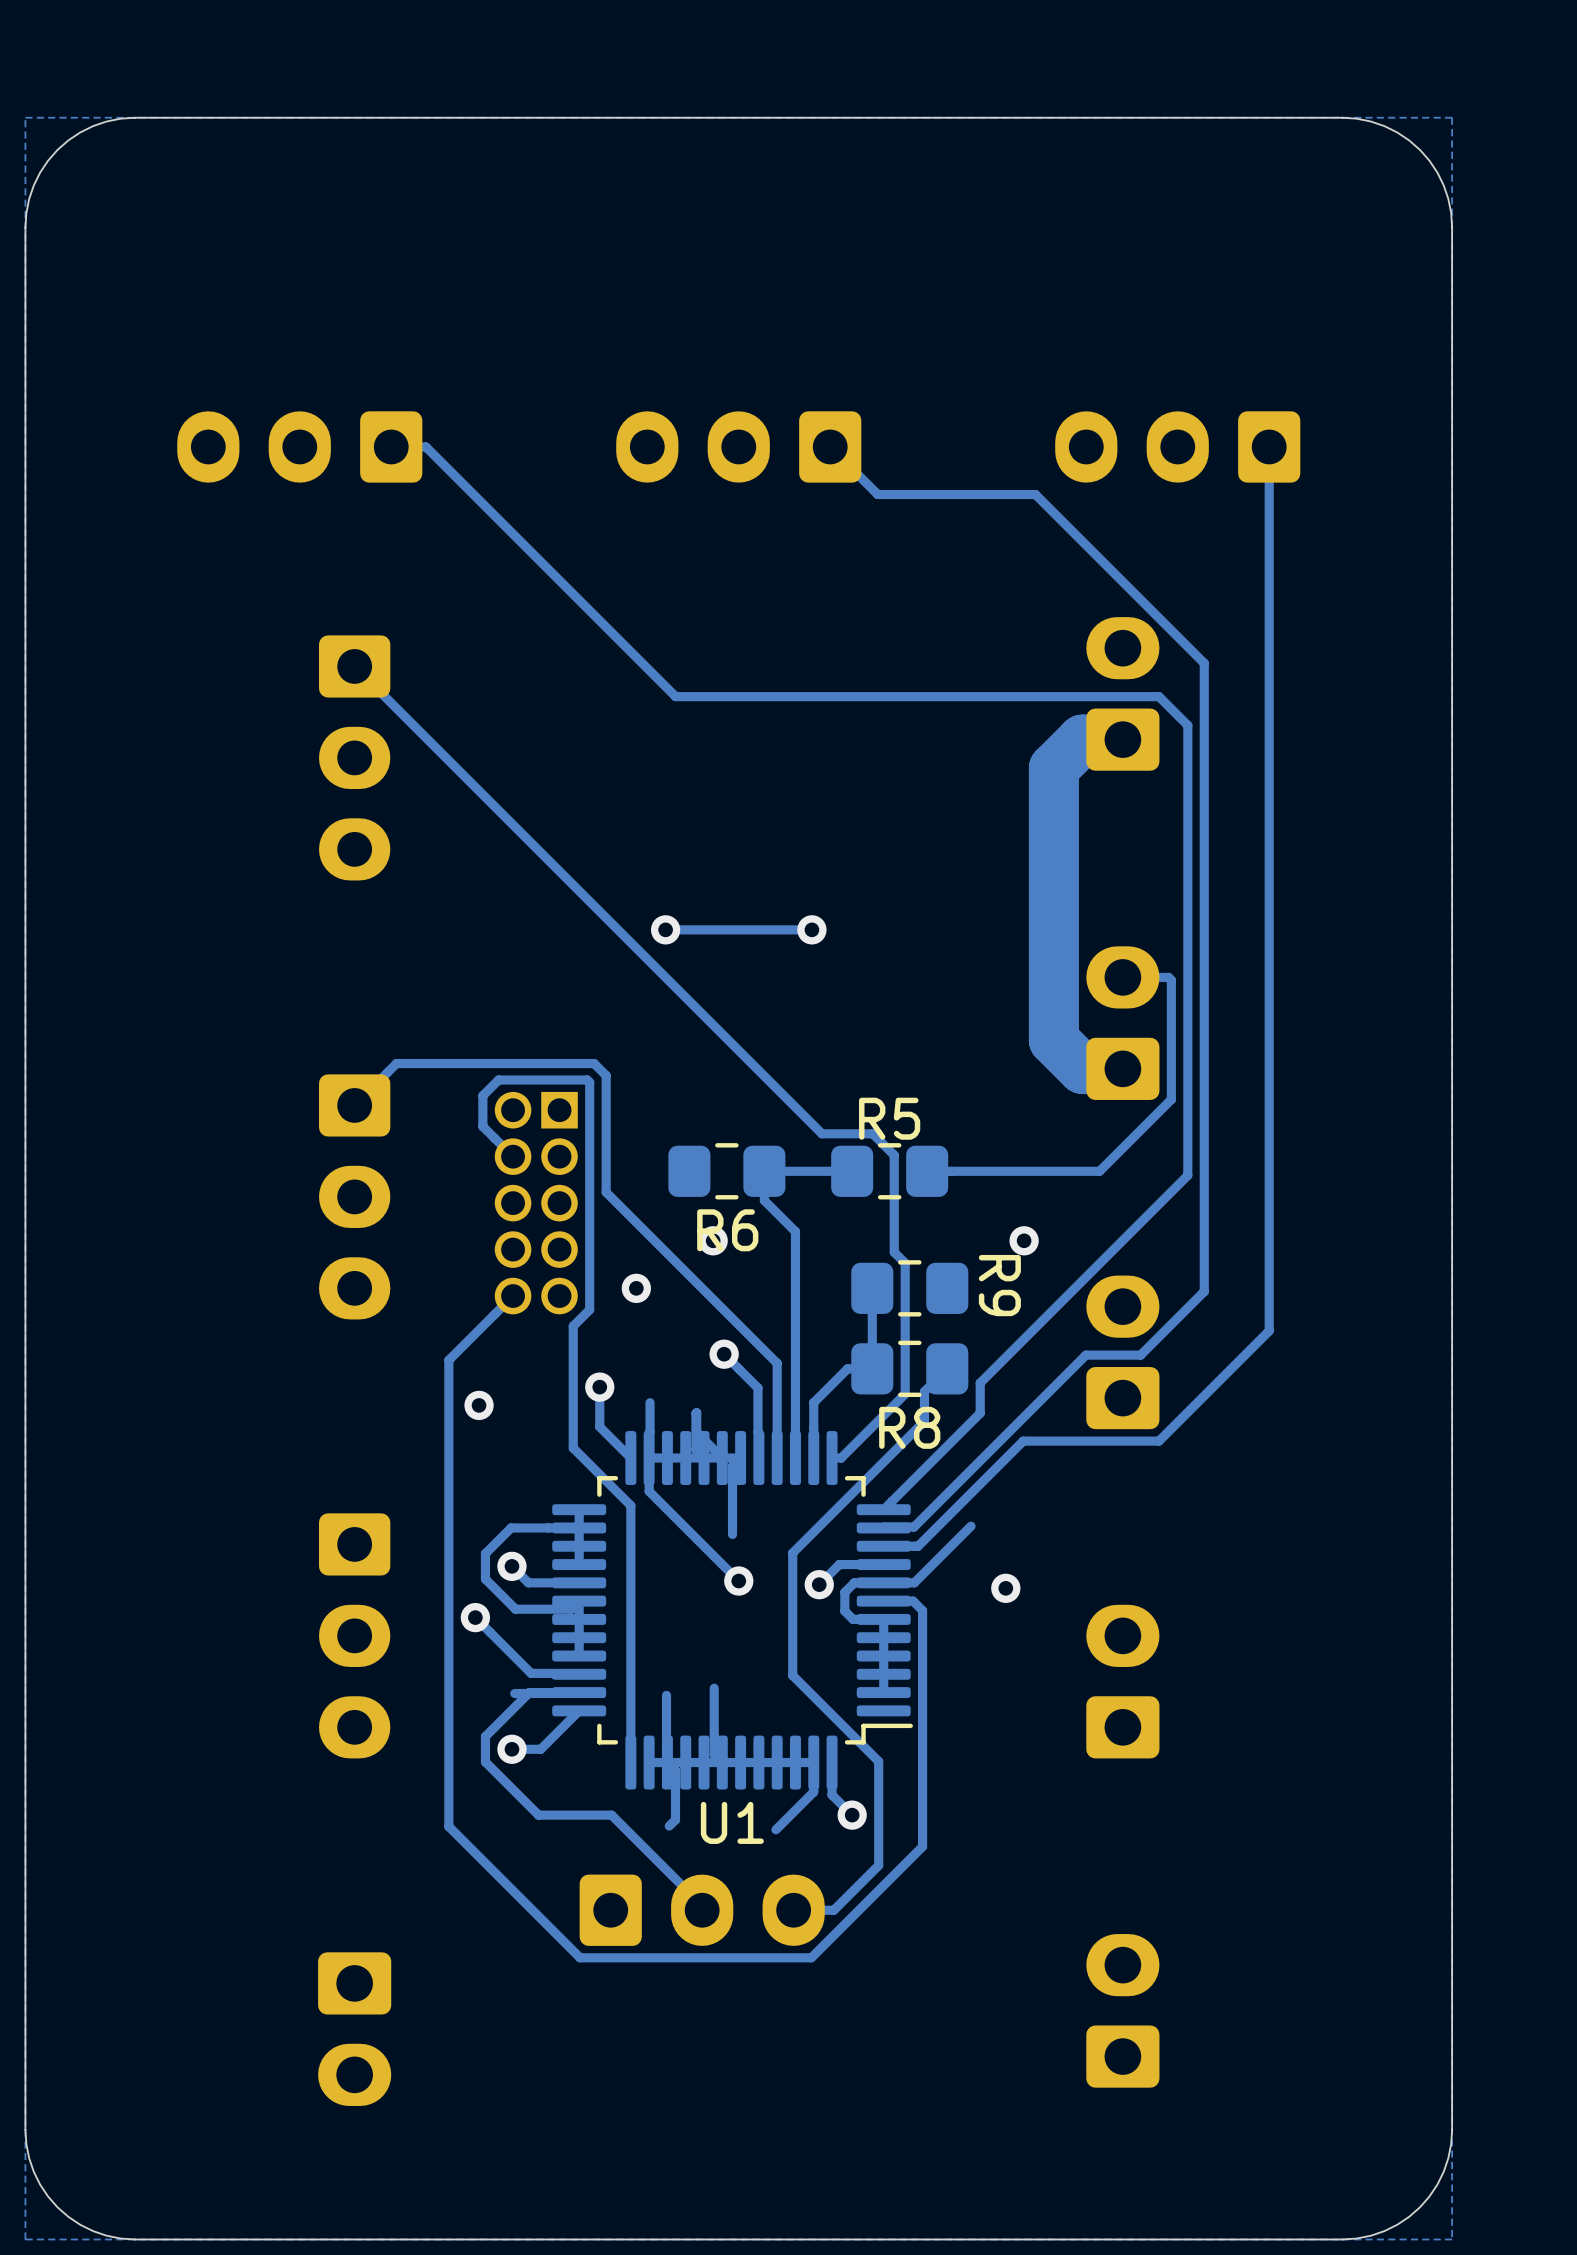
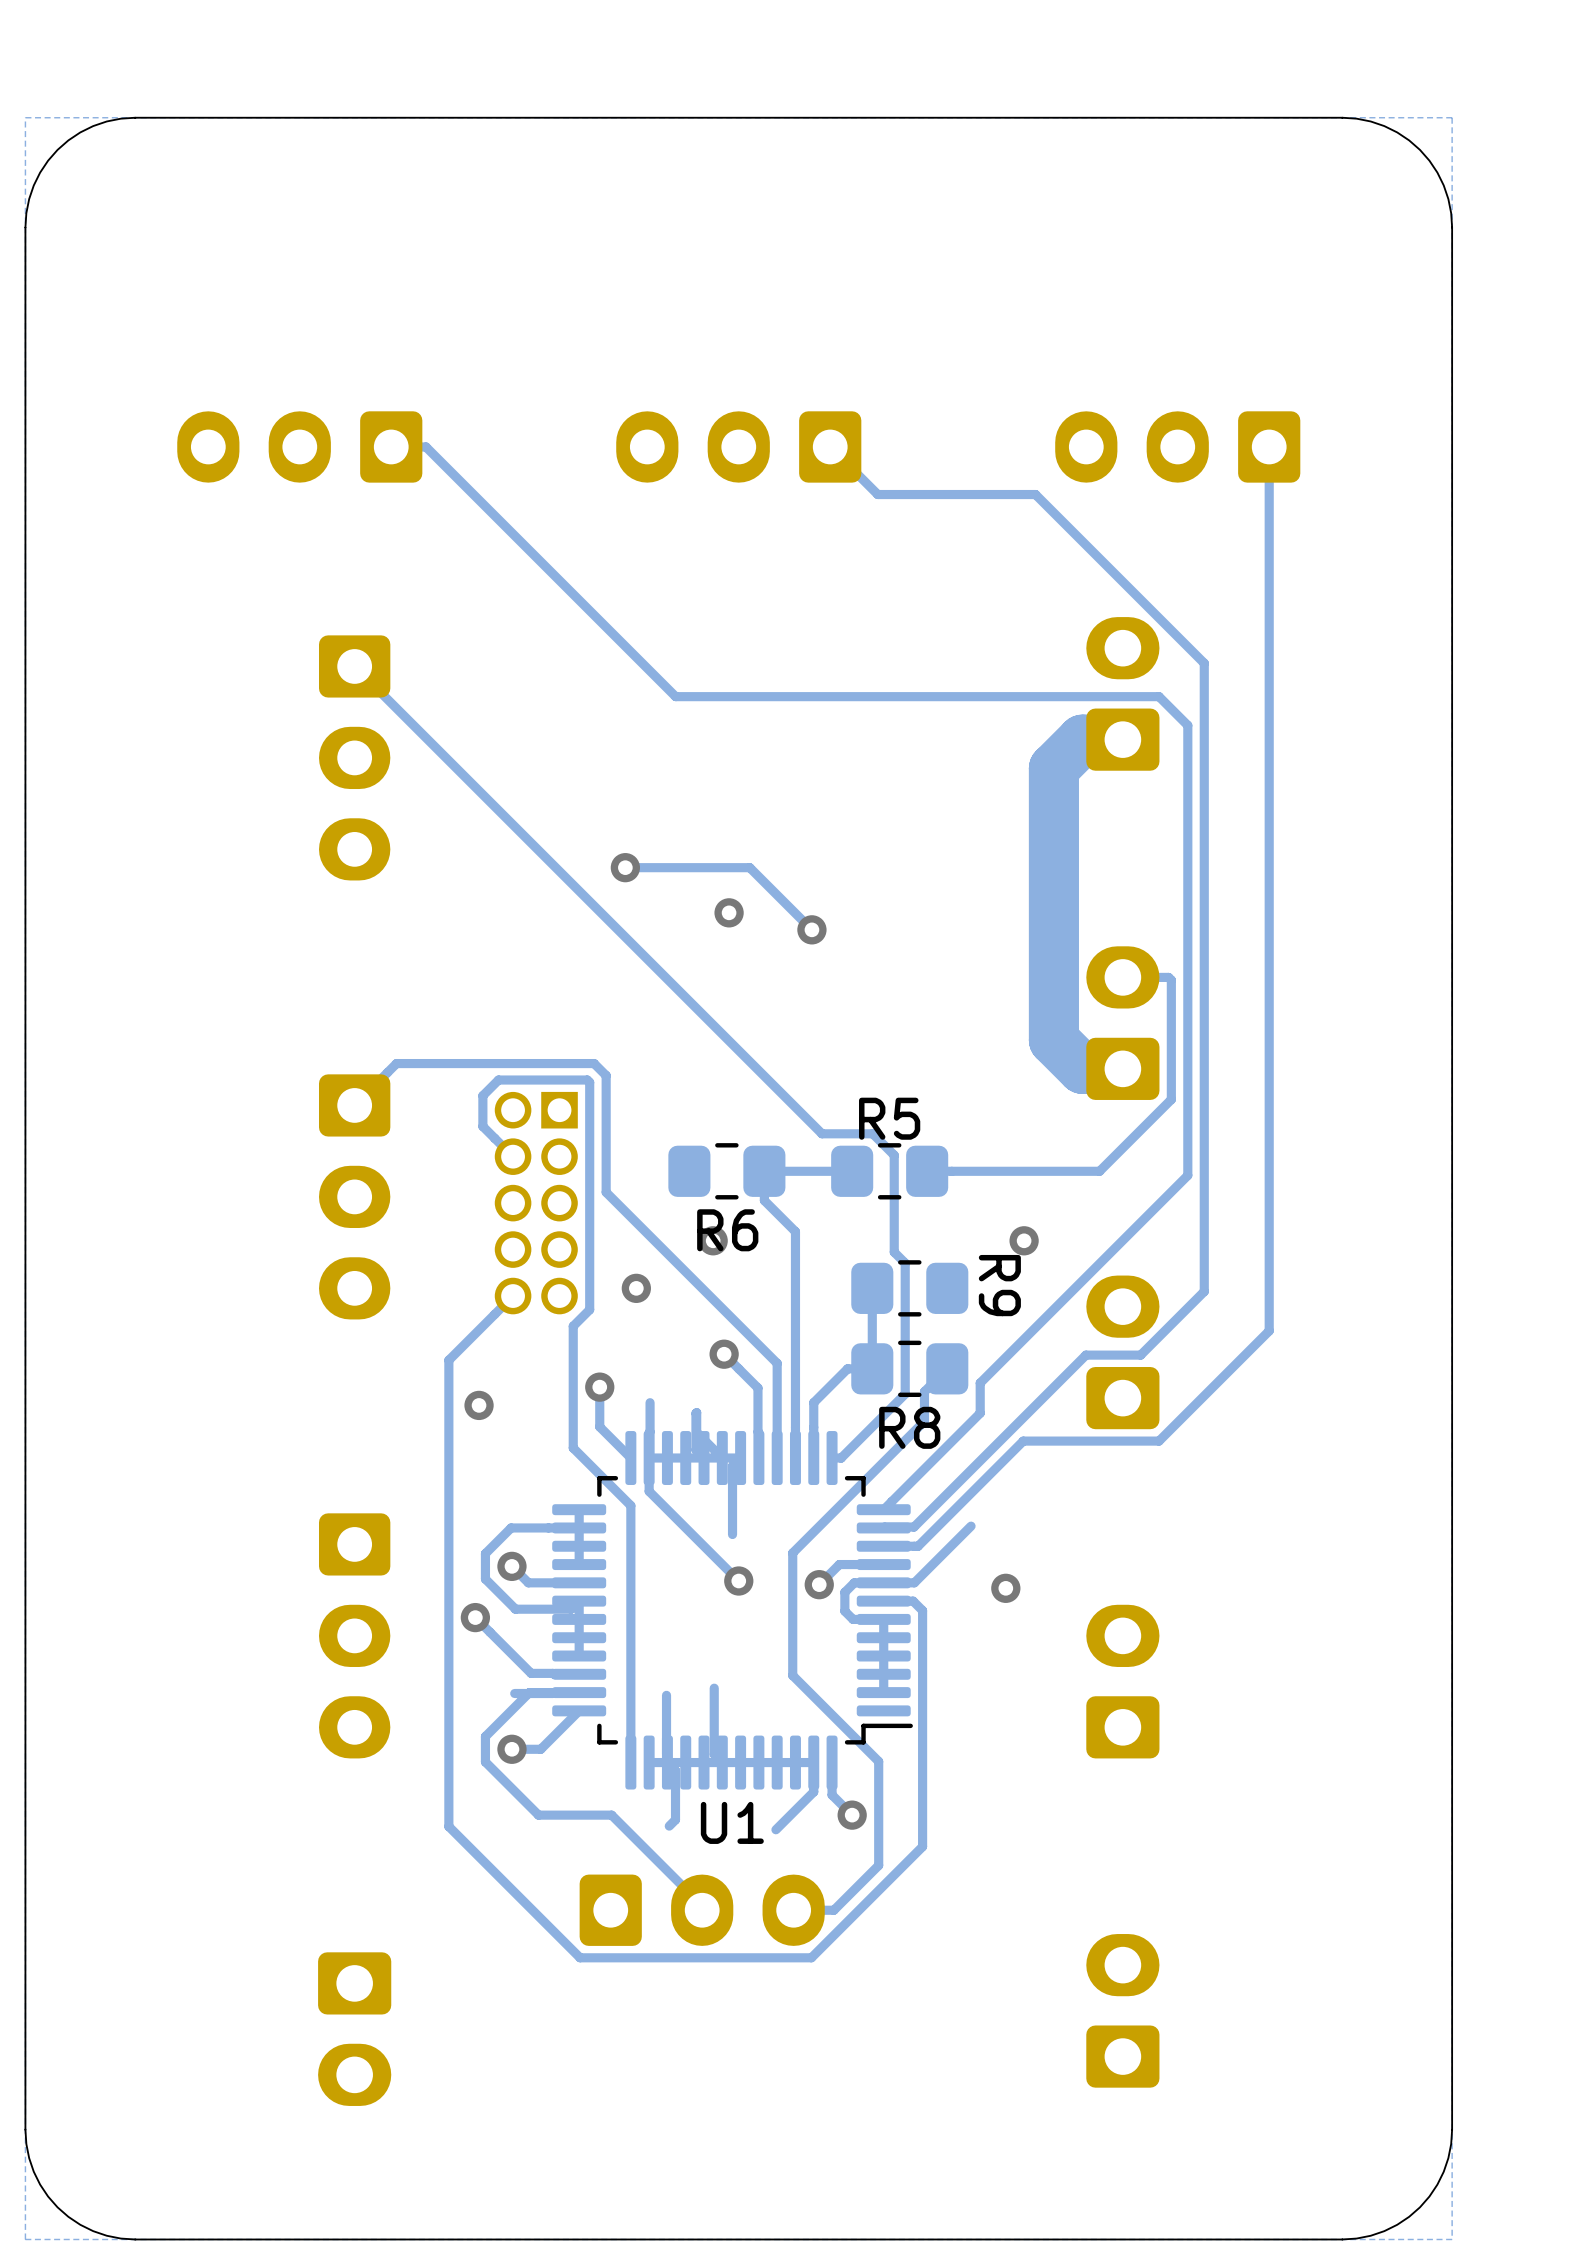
via: none -> (625, 867)
via: none -> (729, 912)
via: (665, 929) -> none
track: (811, 929) (665, 929) -> (811, 929) (749, 867) (625, 867)

